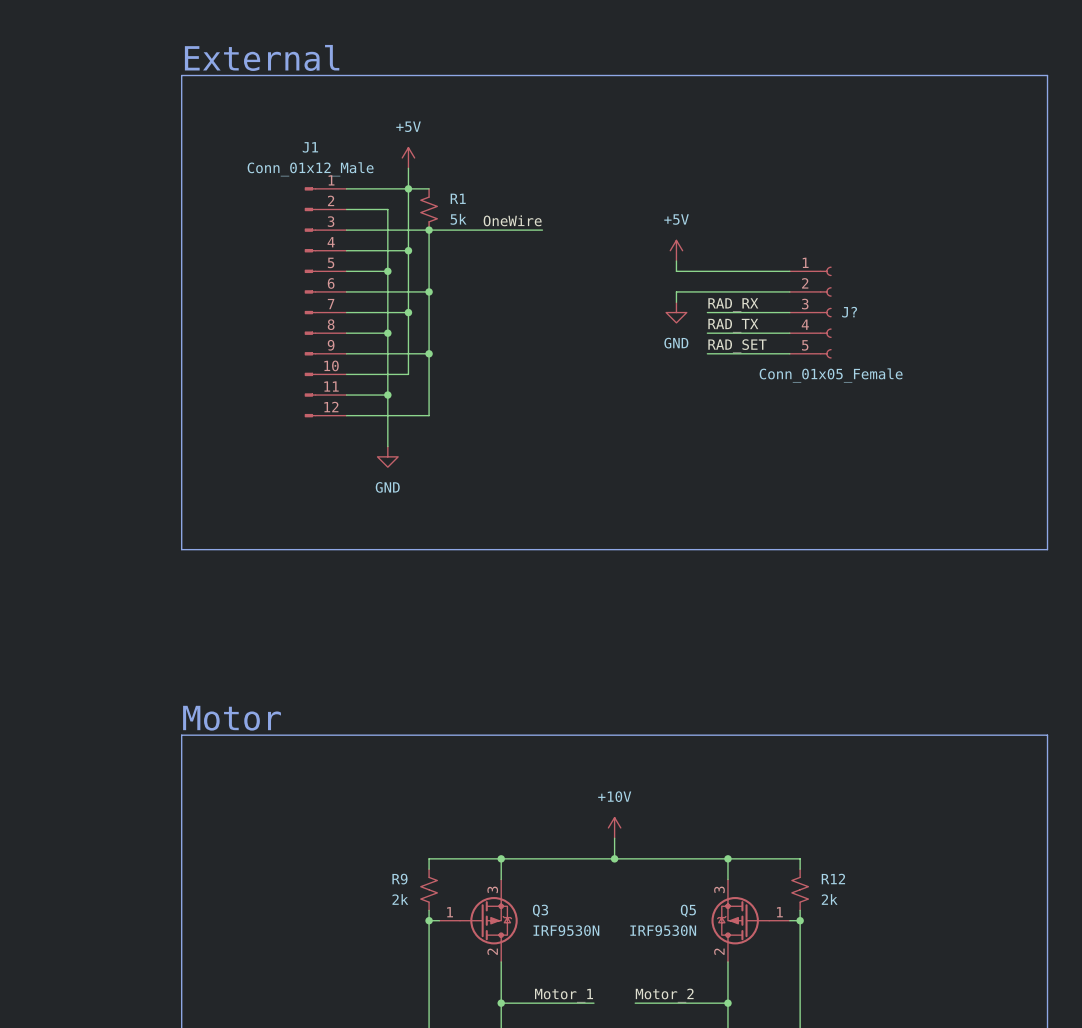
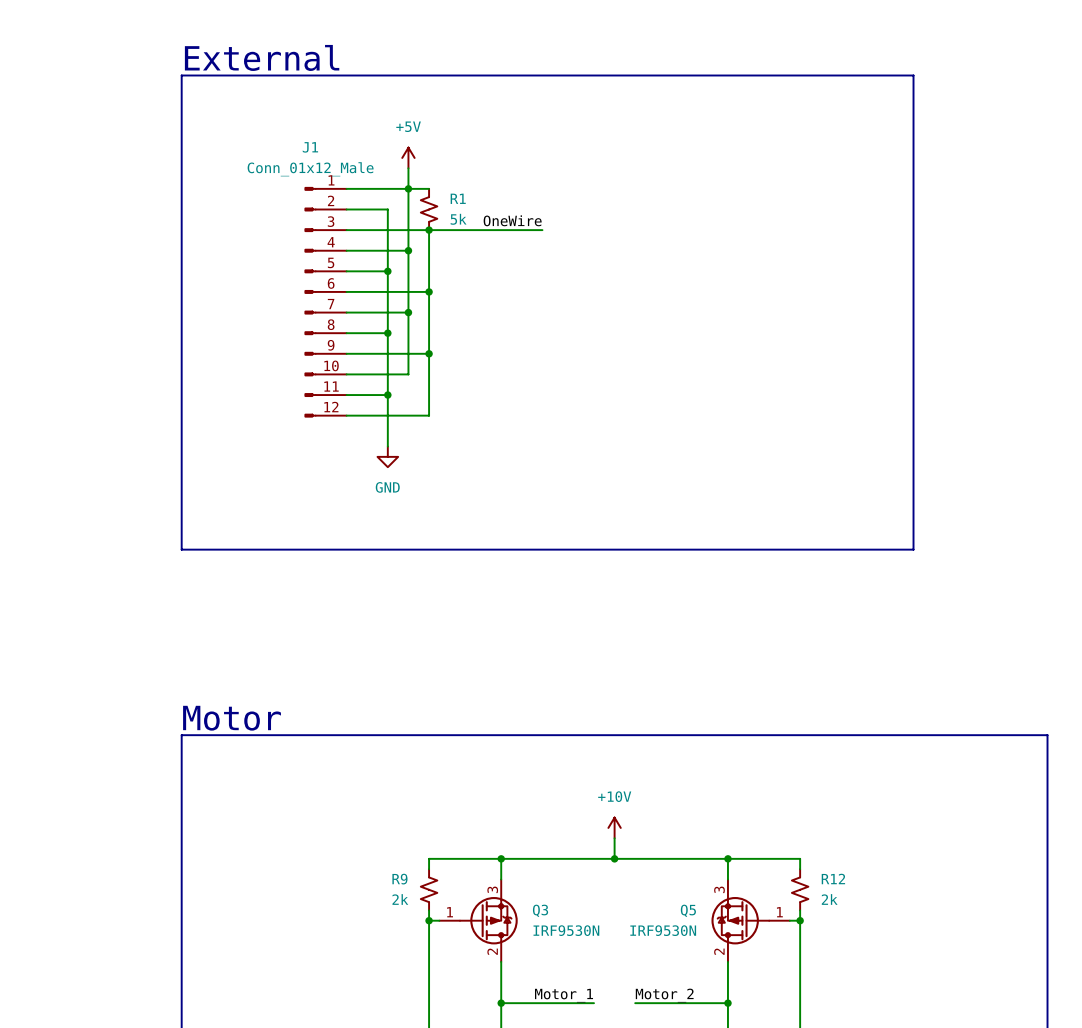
line: (913, 75) (1047, 75) (1047, 549) (913, 549) -> (913, 75) (913, 549)
power symbol: +5V (676, 250) -> none
wire: (676, 261) (676, 271) (789, 271) -> none
wire: (789, 291) (676, 291) (676, 302) -> none
label: RAD_RX (733, 305) -> none
power symbol: GND (676, 312) -> none
wire: (707, 312) (789, 312) -> none
J?: Conn_01x05_Female (810, 312) -> none
label: RAD_TX (733, 325) -> none
wire: (707, 333) (789, 333) -> none
label: RAD_SET (737, 346) -> none
wire: (707, 353) (789, 353) -> none

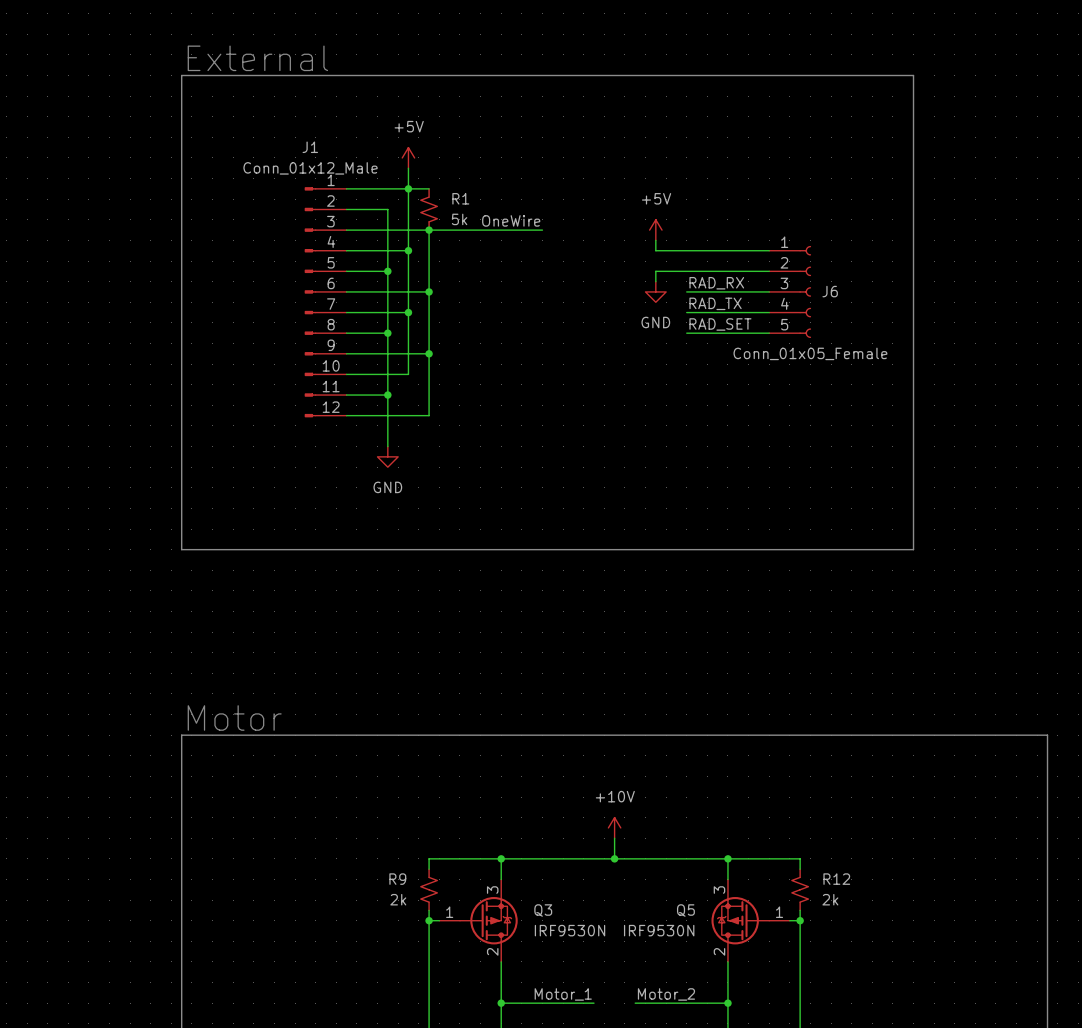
power symbol: none -> +5V (655, 230)
wire: none -> (655, 240) (655, 250) (769, 250)
wire: none -> (769, 271) (655, 271) (655, 281)
label: none -> RAD_RX (716, 283)
power symbol: none -> GND (655, 291)
wire: none -> (686, 291) (769, 291)
J6: none -> Conn_01x05_Female (790, 291)
label: none -> RAD_TX (715, 303)
wire: none -> (686, 312) (769, 312)
label: none -> RAD_SET (720, 324)
wire: none -> (686, 333) (769, 333)

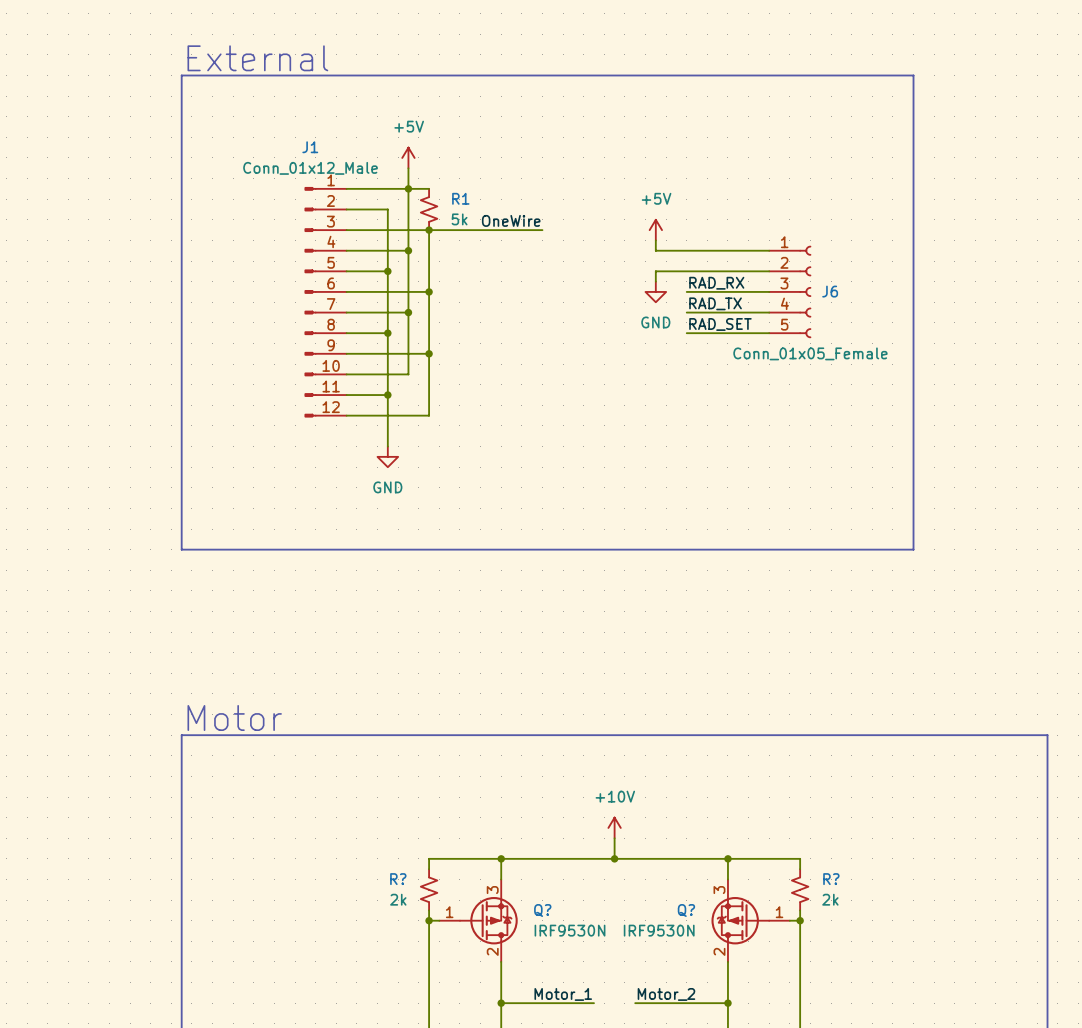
R9 name: R9 (397, 879) -> R? (398, 879)
R12 name: R12 (836, 879) -> R? (831, 879)
Q3 name: Q3 (543, 910) -> Q? (542, 910)
Q5 name: Q5 (685, 910) -> Q? (686, 910)

